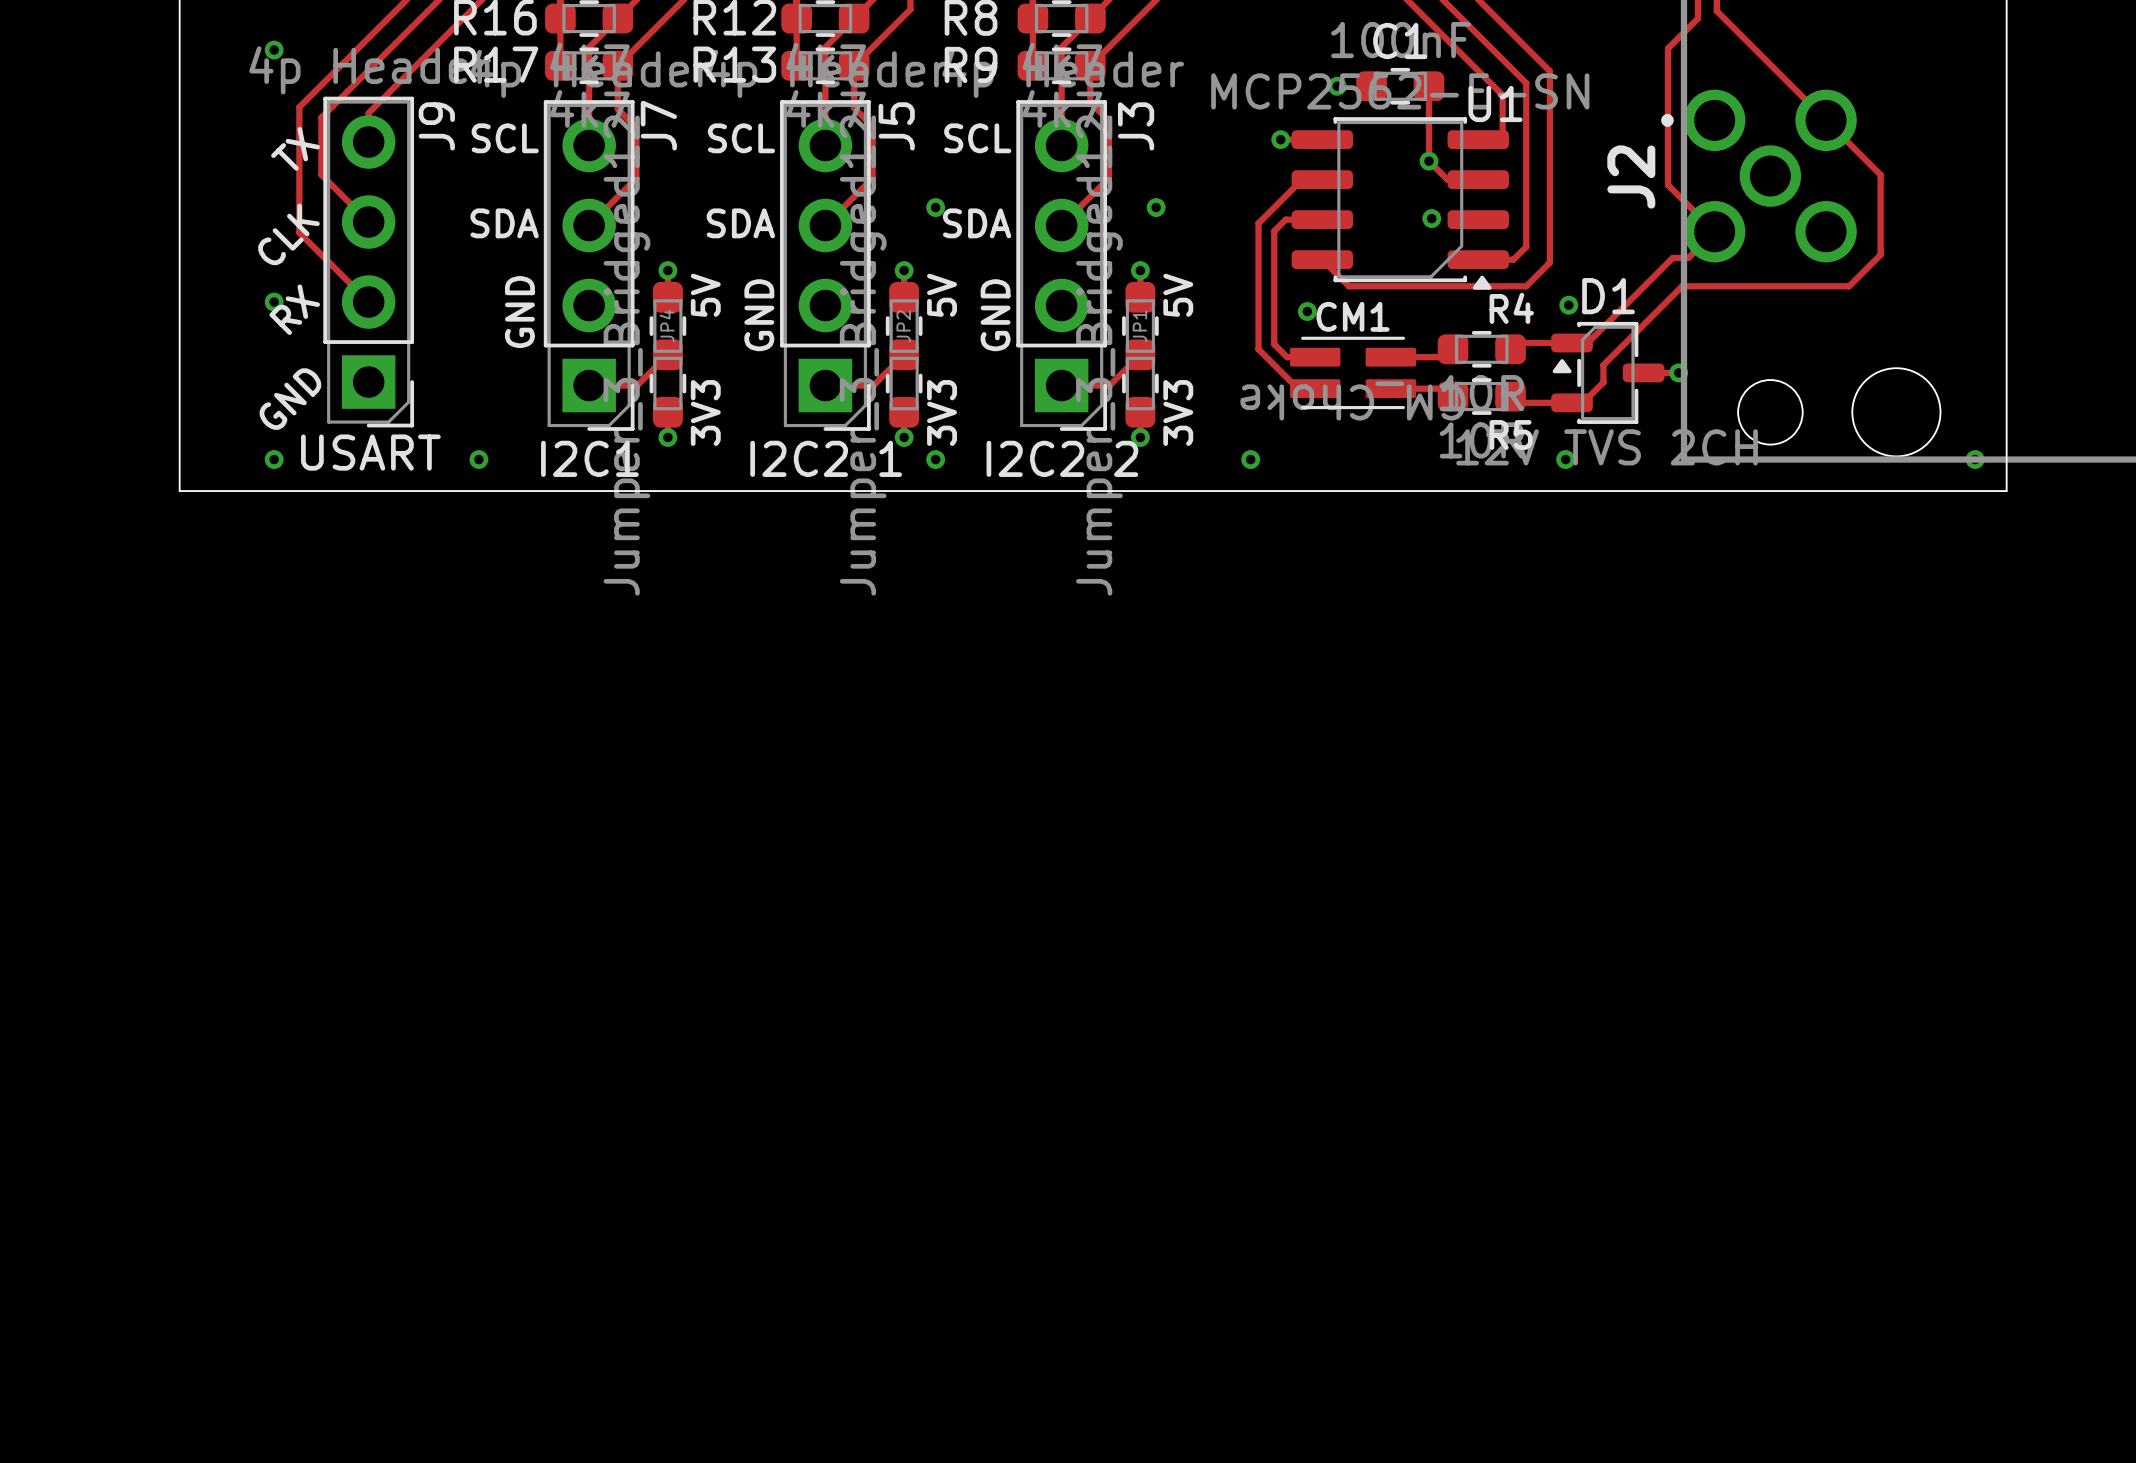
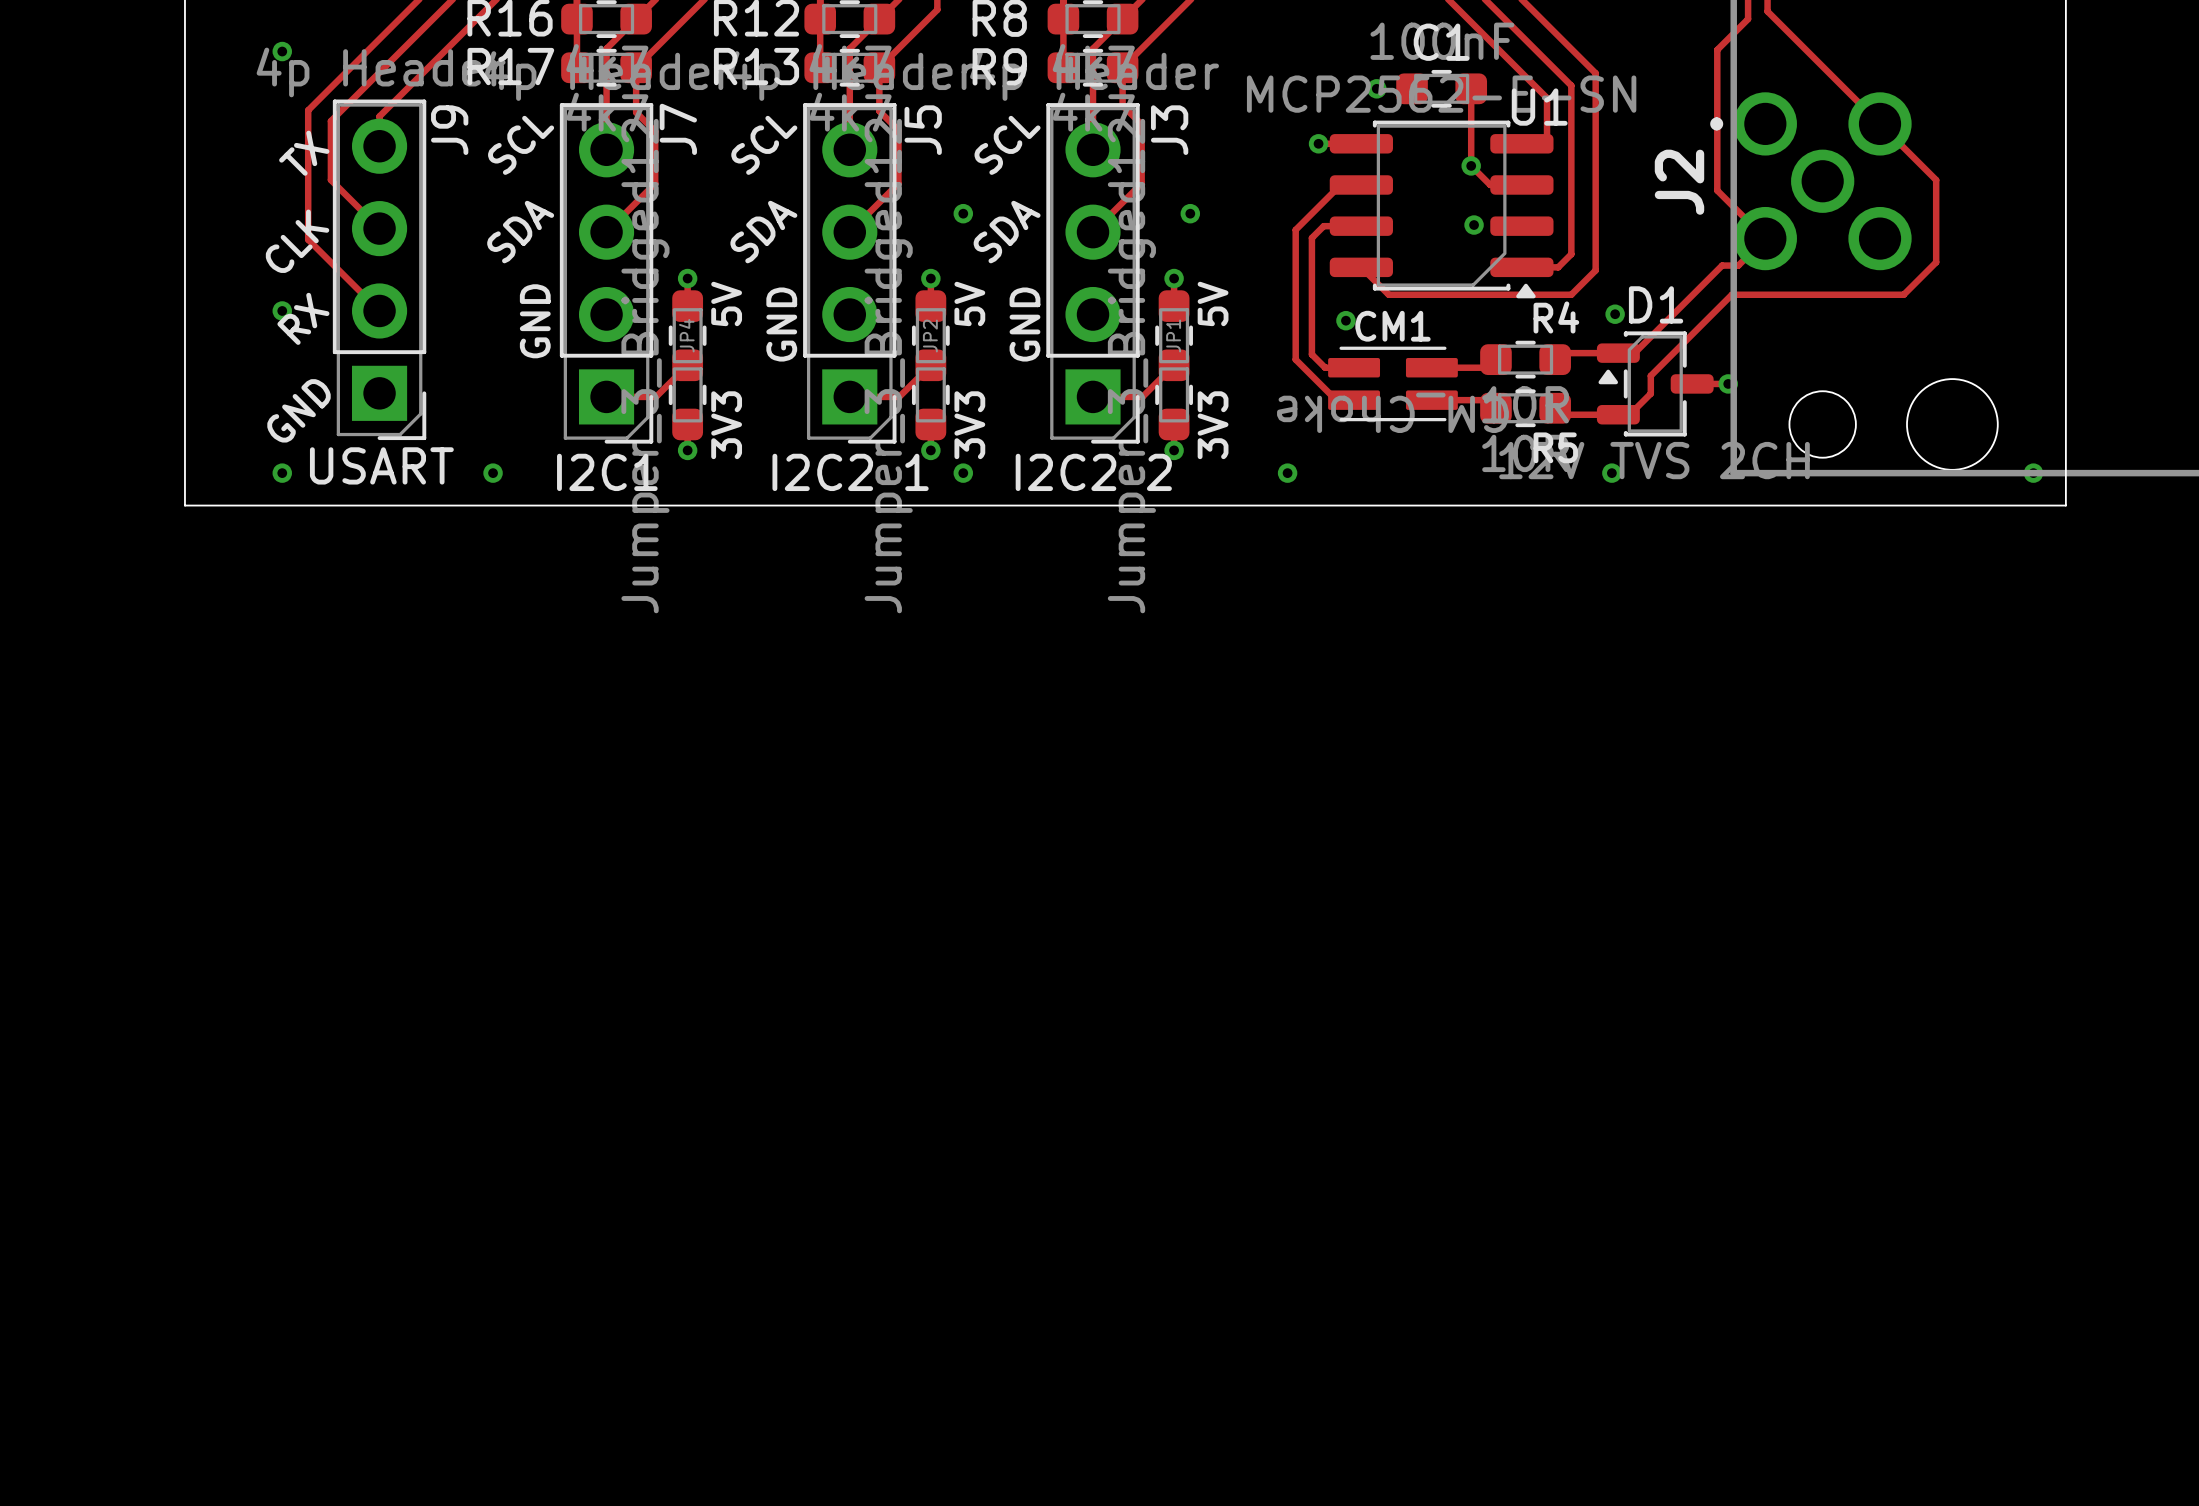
text rotation: 0° (505, 138) -> 45° counterclockwise (521, 145)
text rotation: 0° (741, 138) -> 45° counterclockwise (764, 145)
text rotation: 0° (977, 138) -> 45° counterclockwise (1007, 145)
text rotation: 0° (504, 223) -> 45° counterclockwise (520, 232)
text rotation: 0° (740, 223) -> 45° counterclockwise (763, 232)
text rotation: 0° (977, 223) -> 45° counterclockwise (1007, 232)

